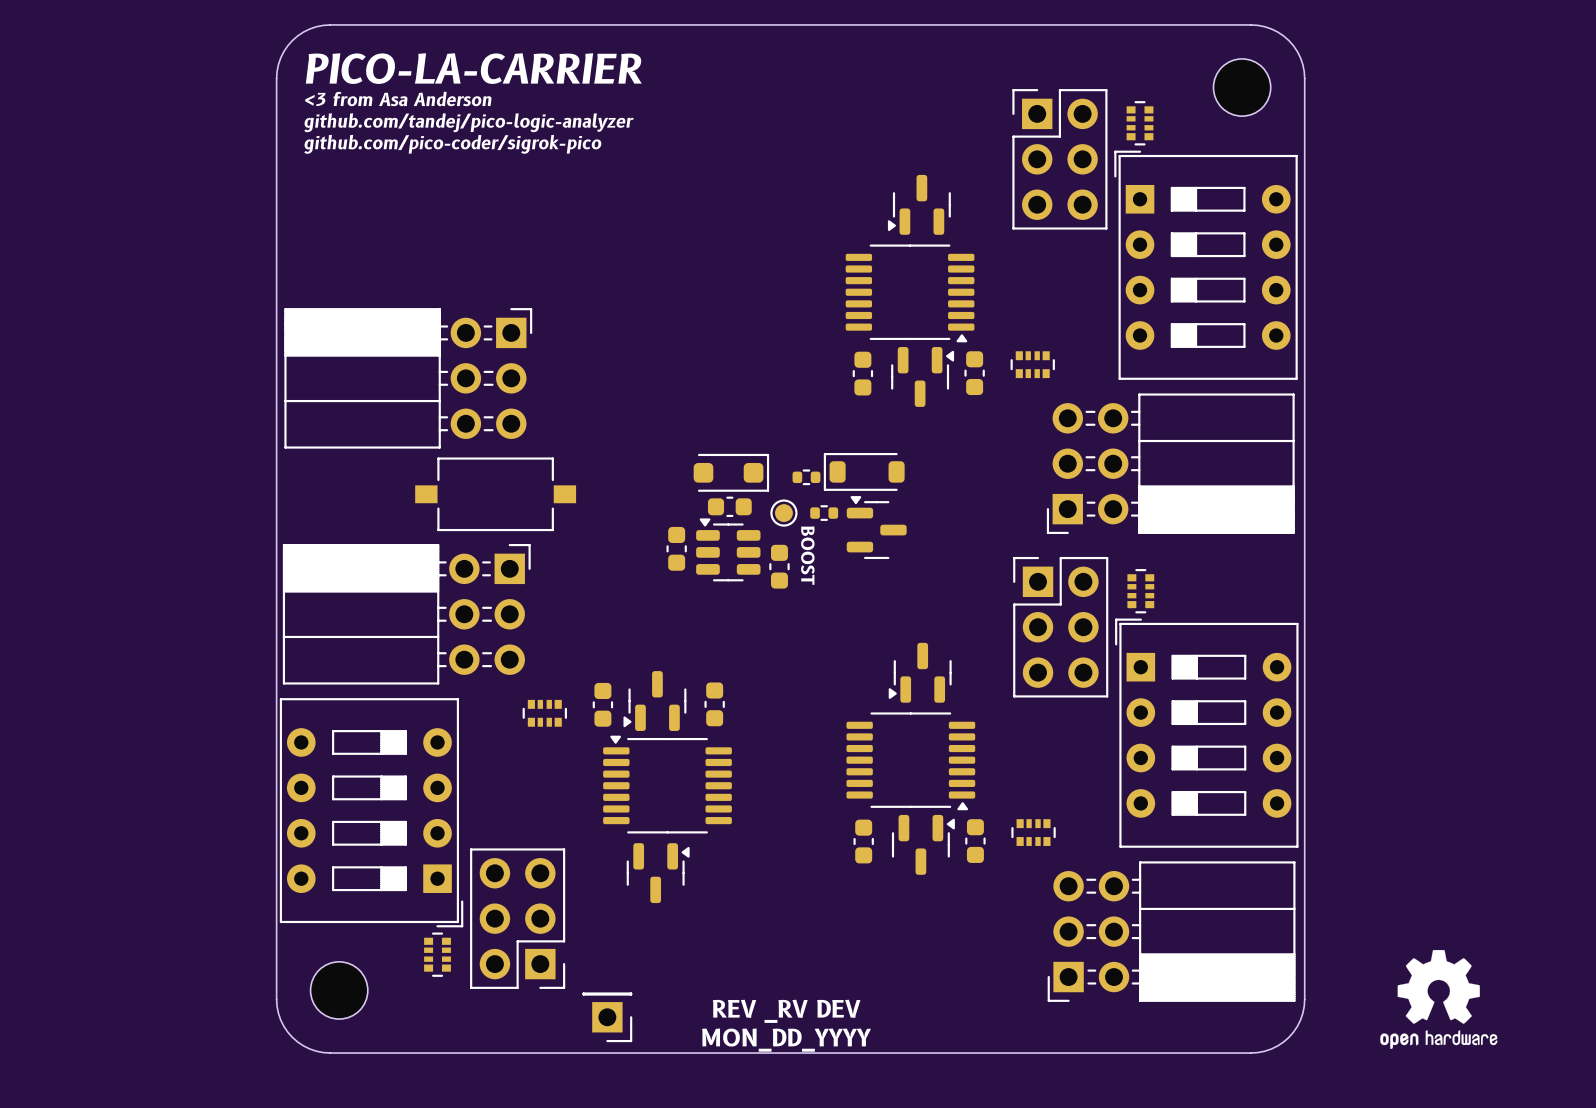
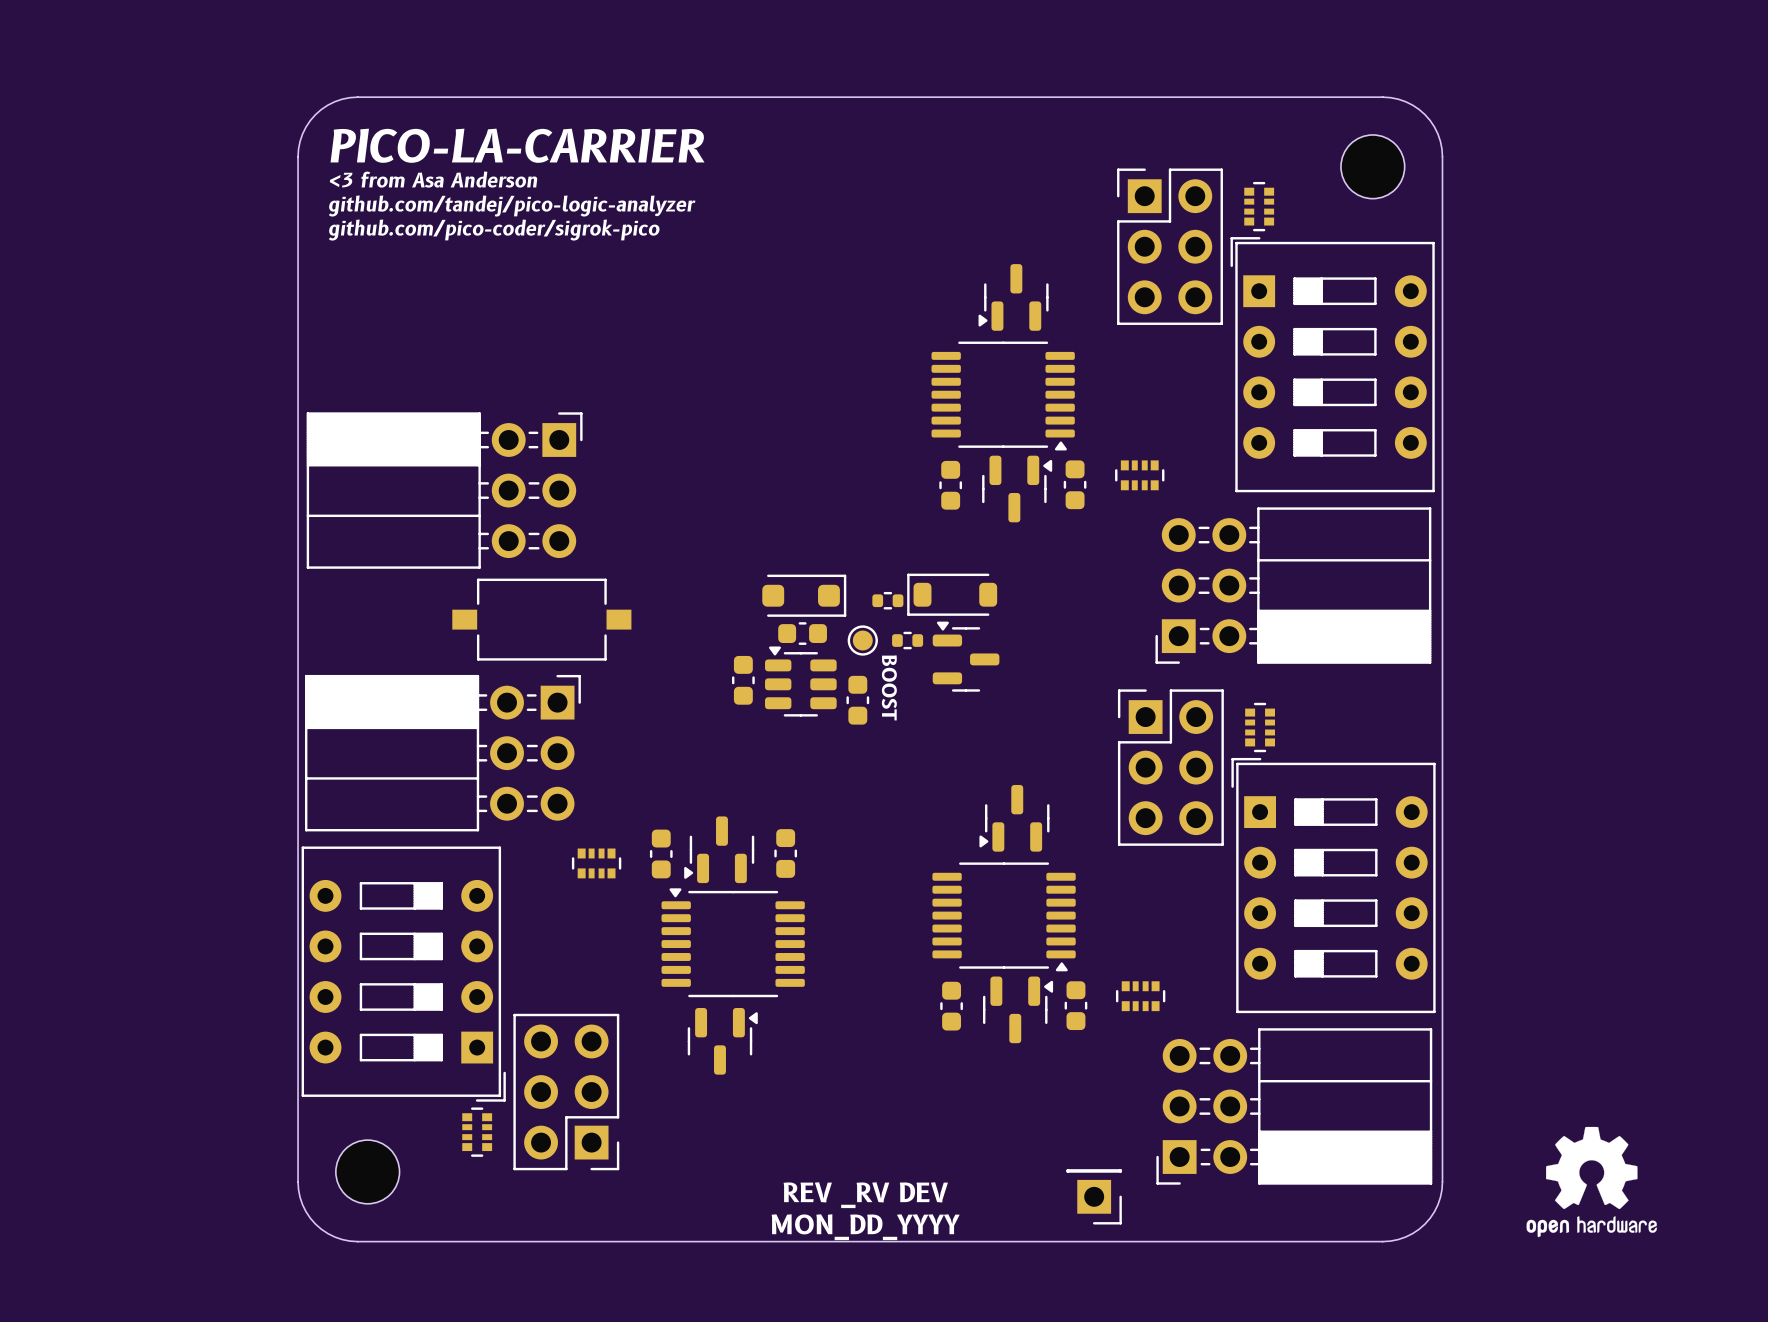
part position: (607, 1017) -> (1094, 1196)

